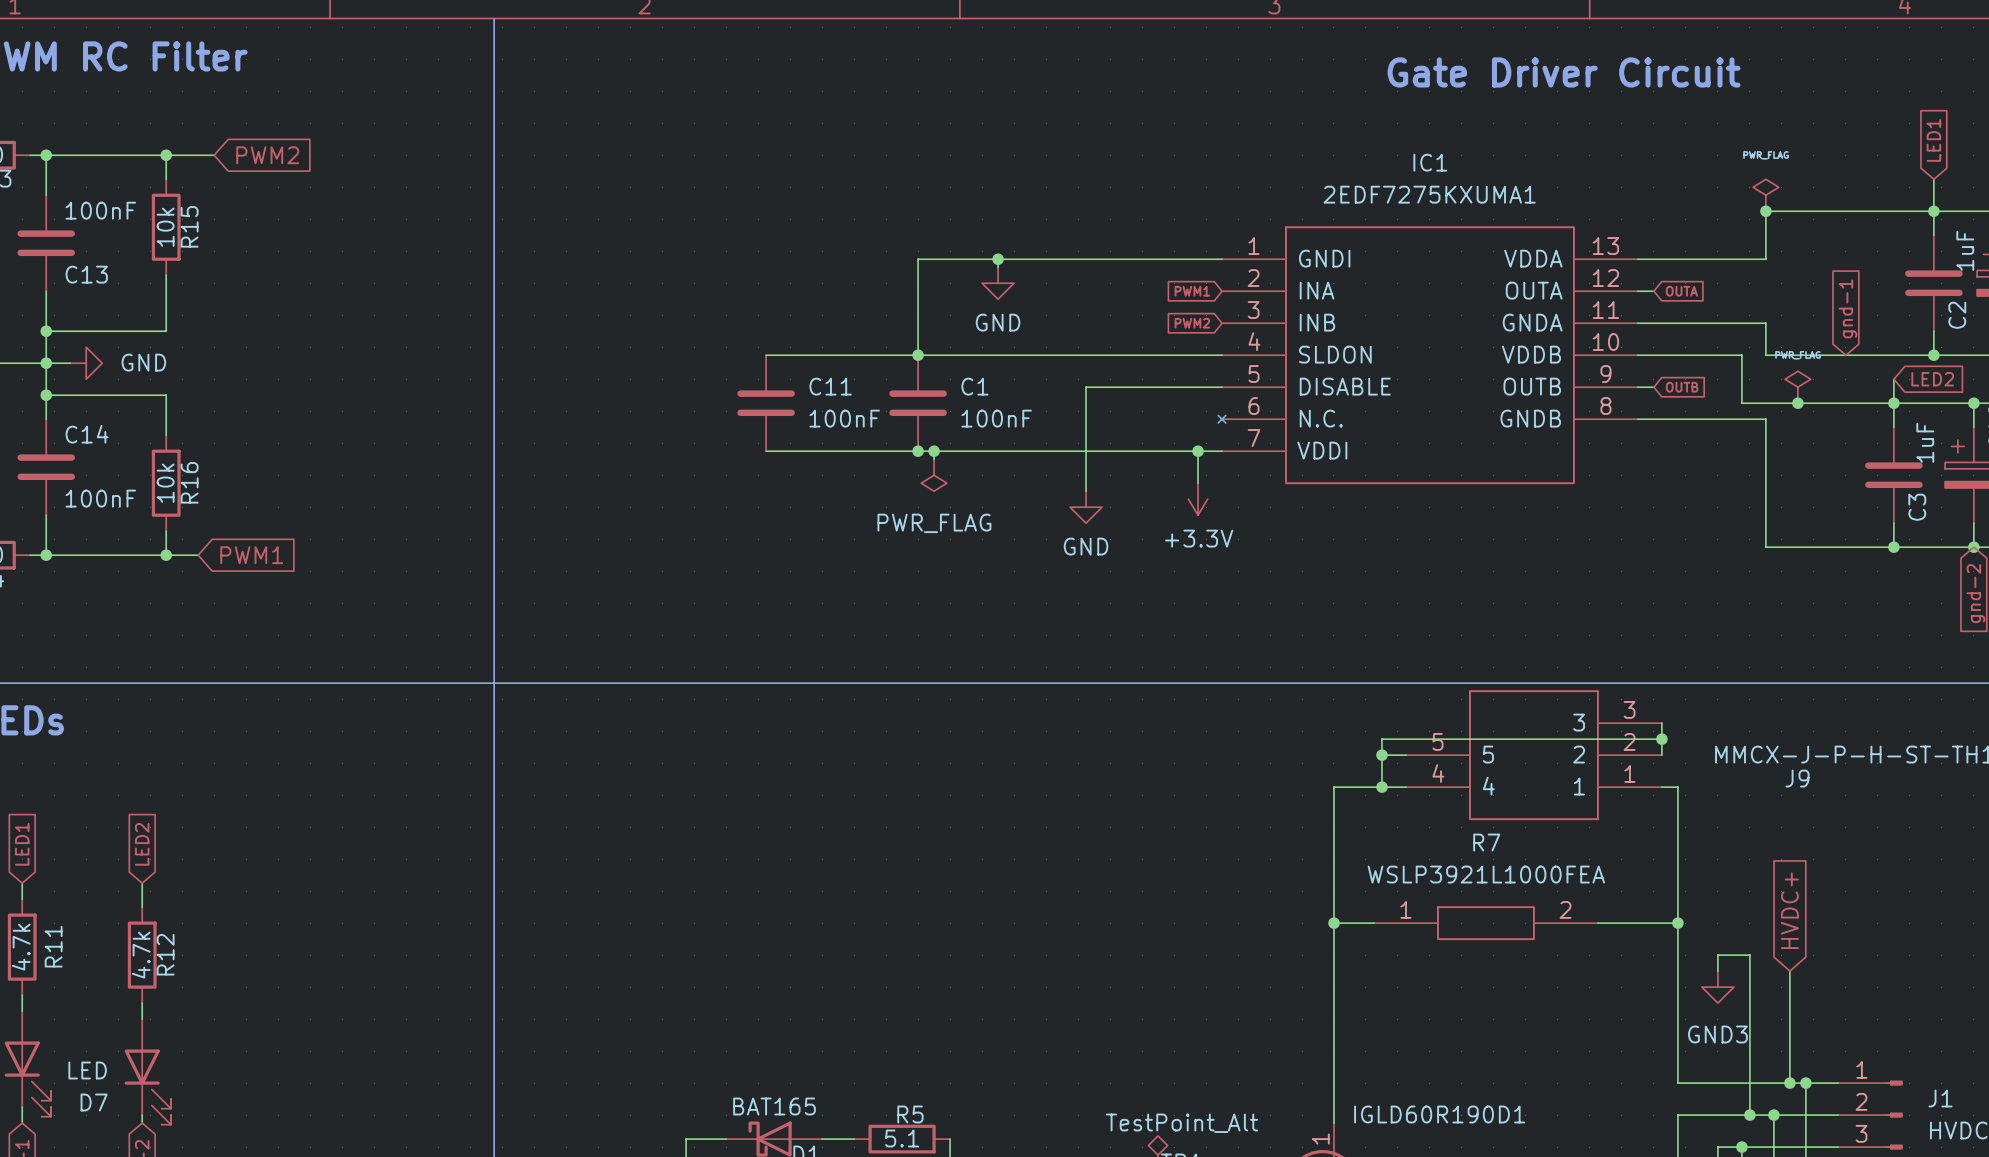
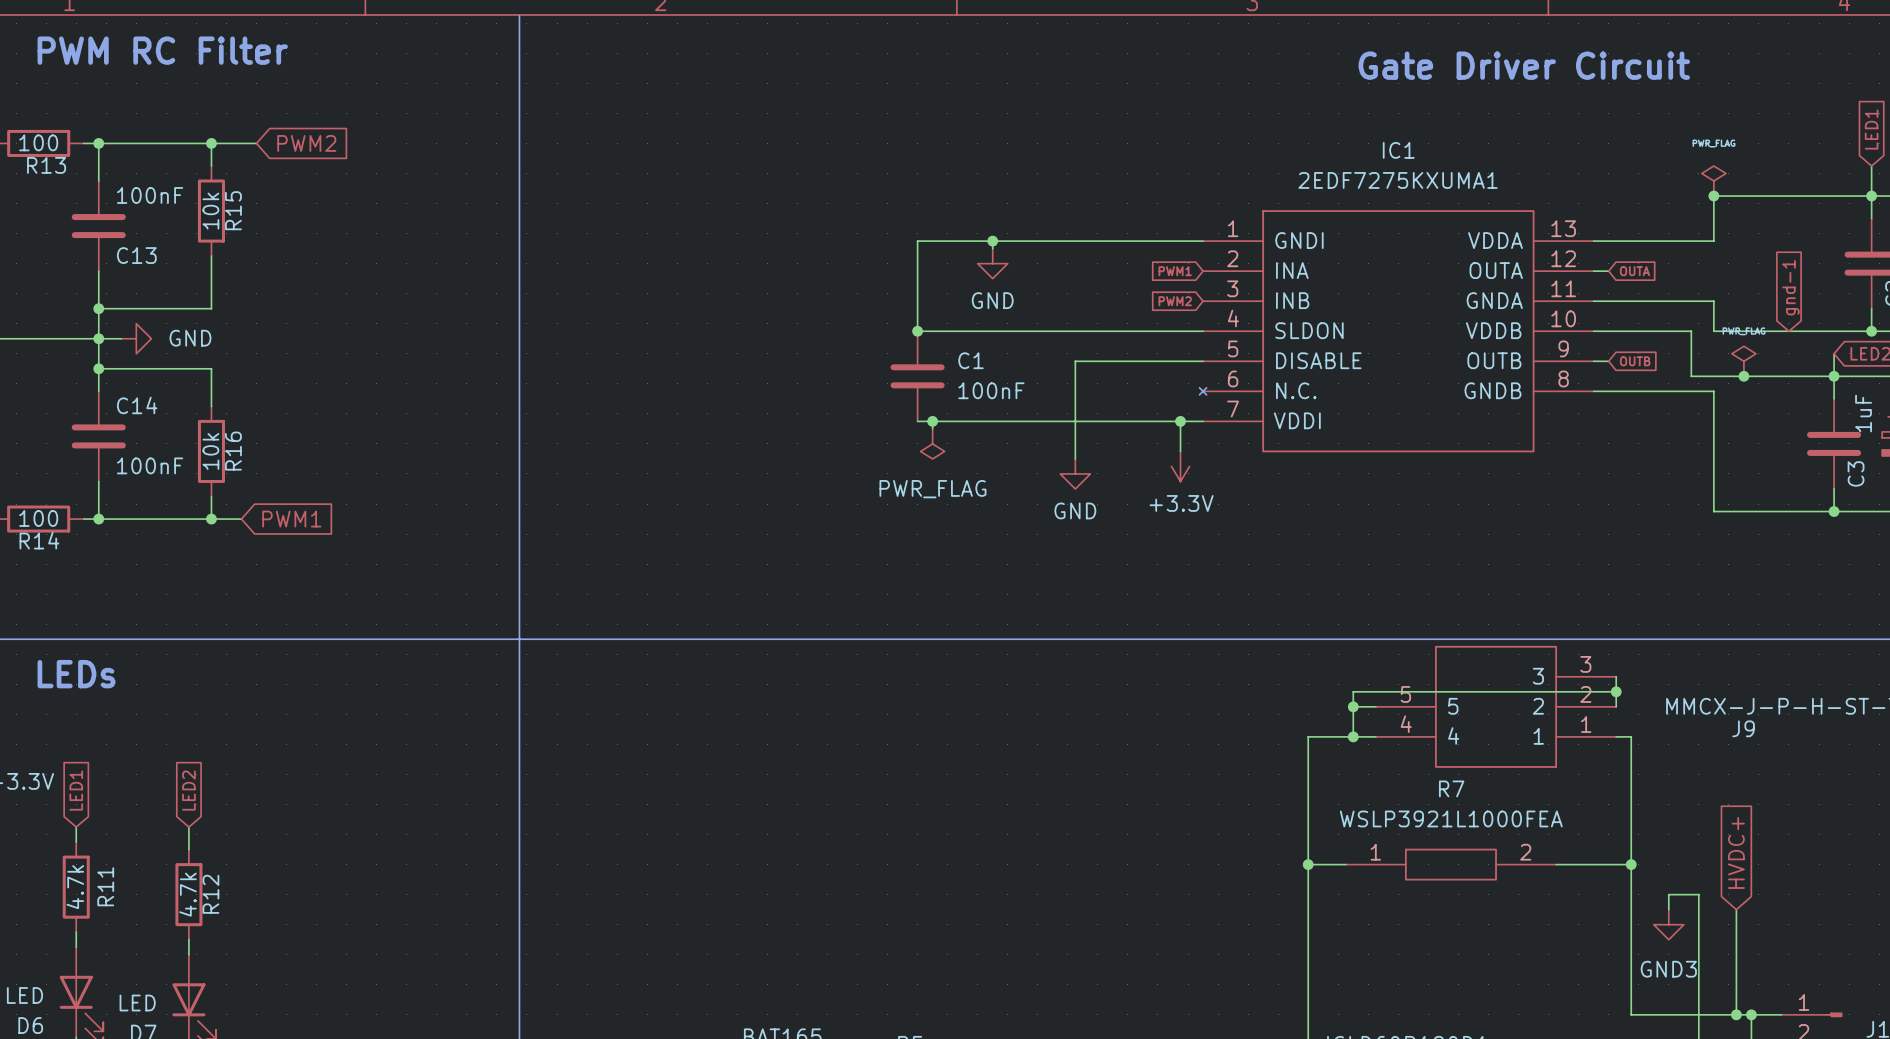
wire: (766, 355) (918, 355) -> none
C11: 100nF (766, 403) -> none
wire: (766, 451) (918, 451) -> none
junction: (918, 451) -> none

